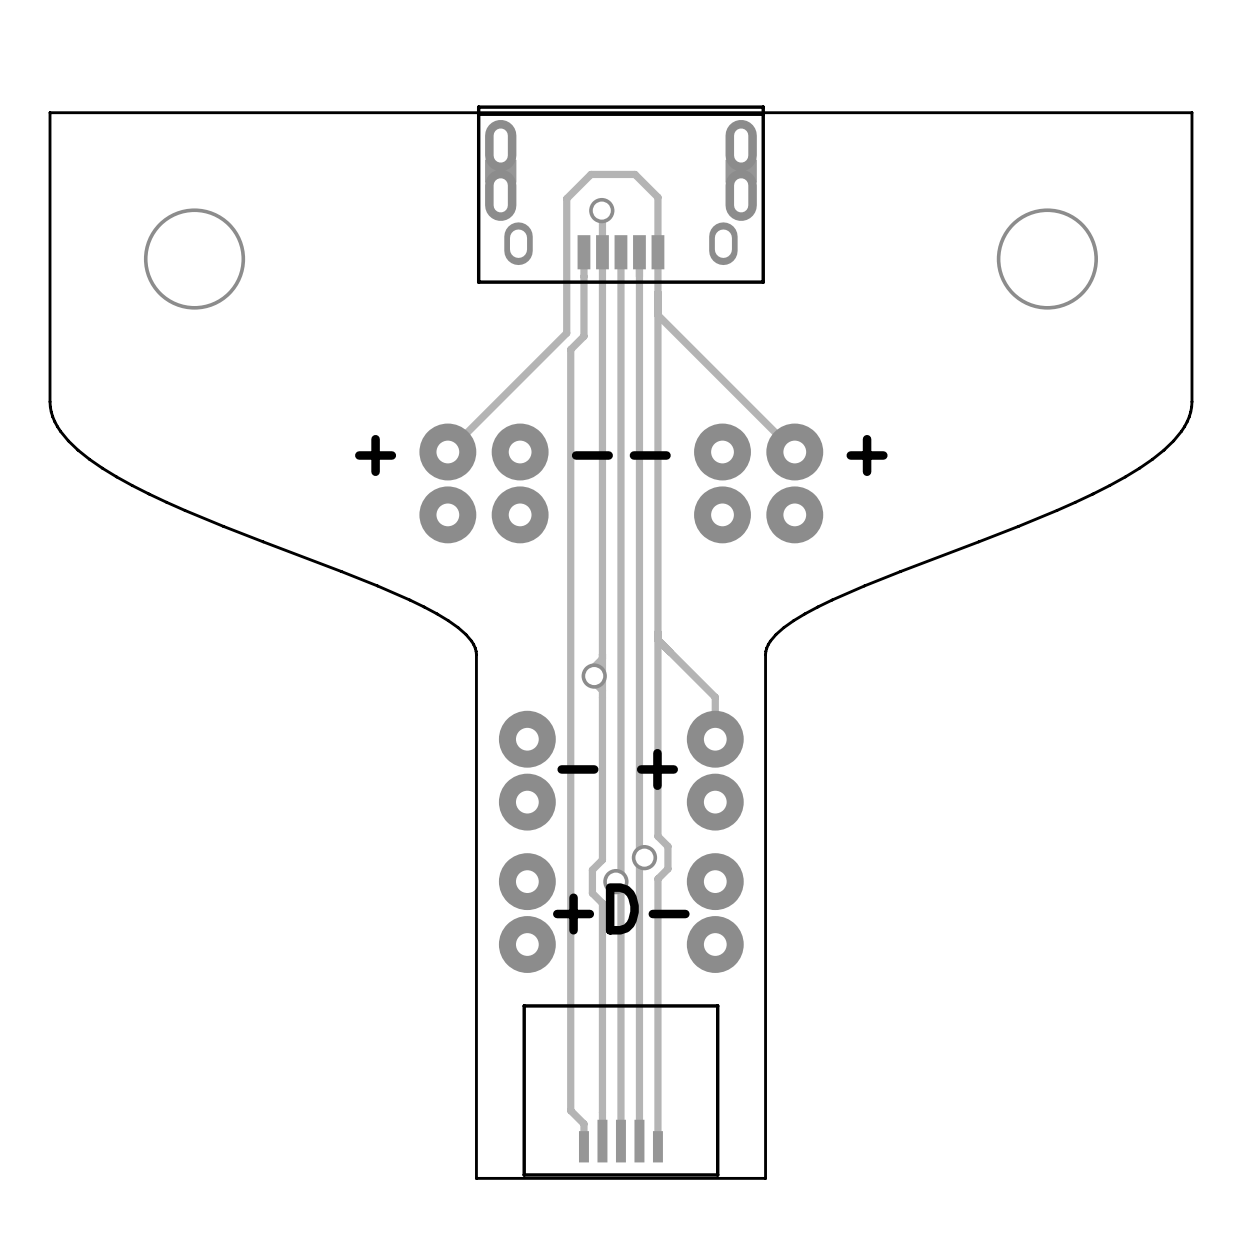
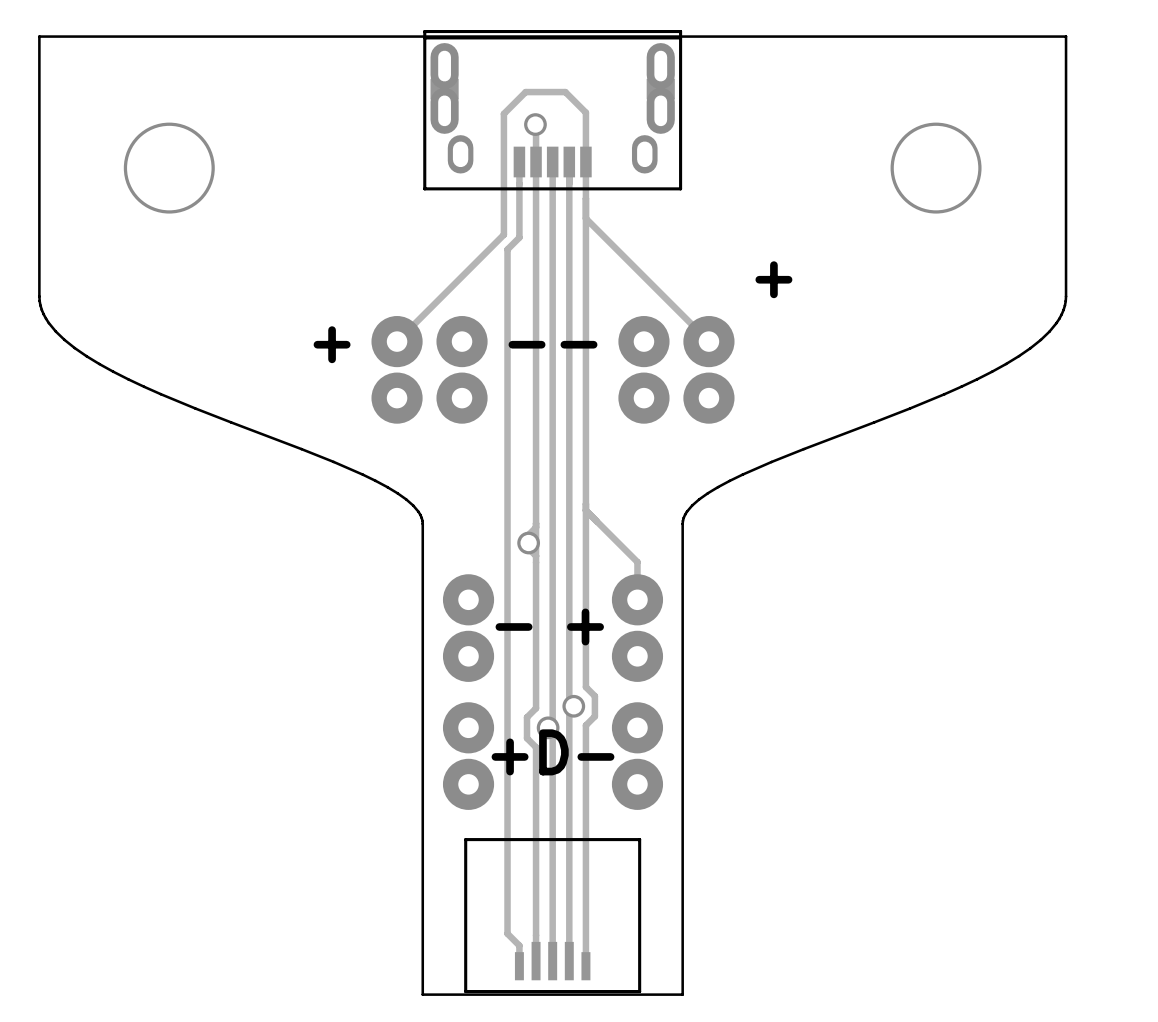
text position: + (867, 455) -> + (773, 279)

